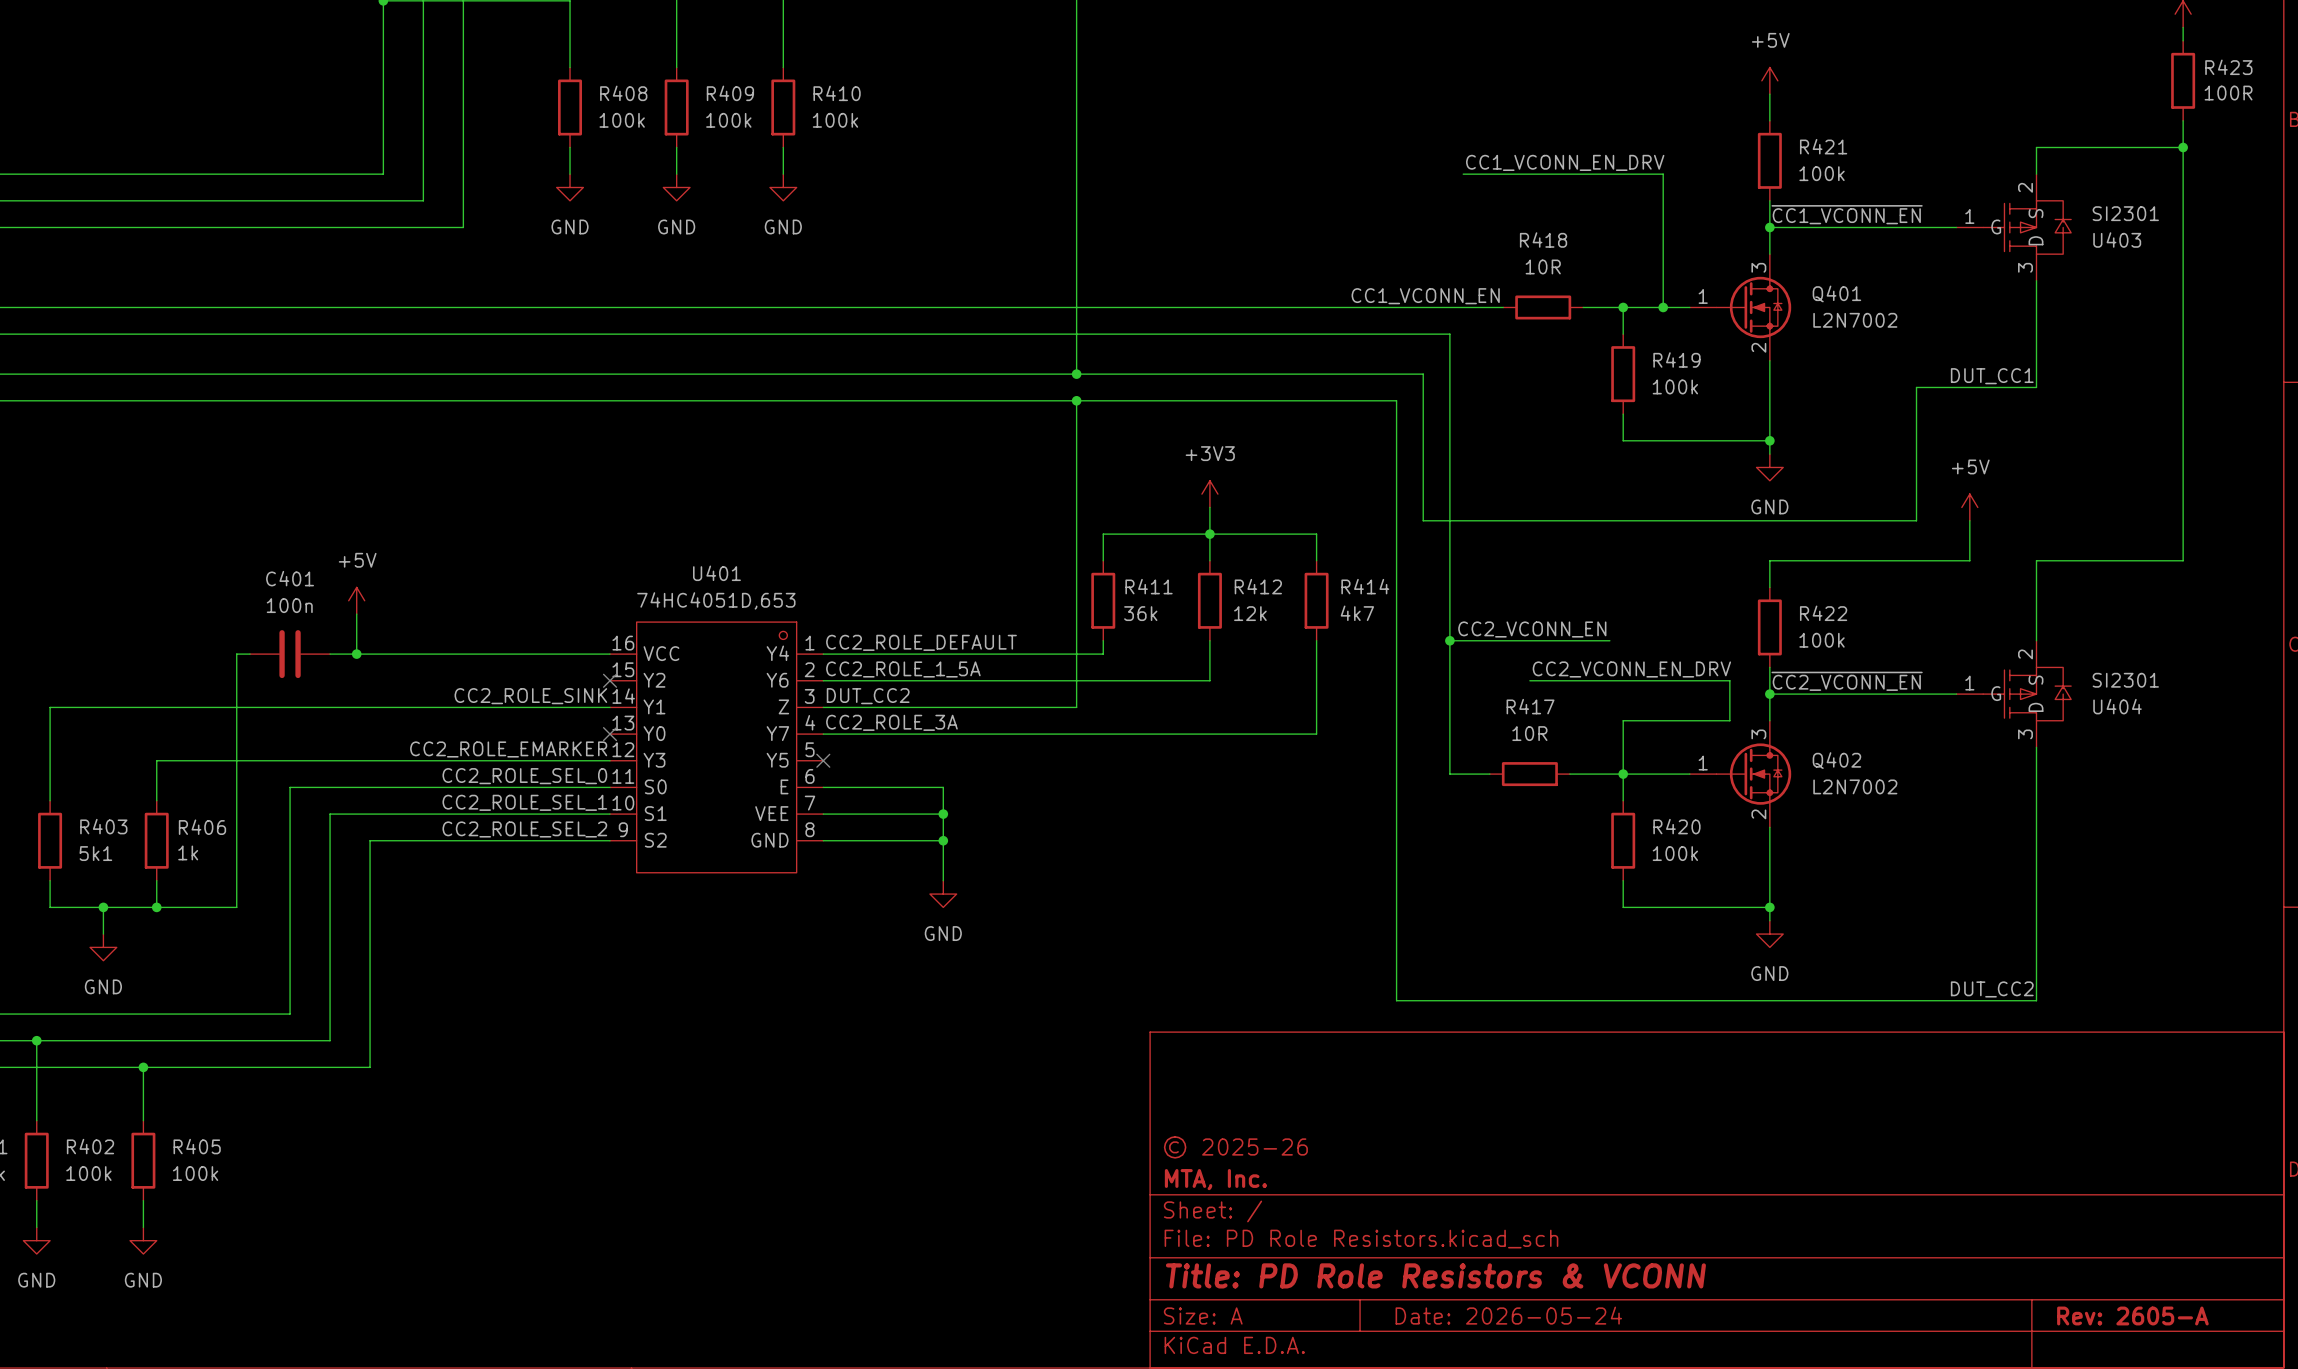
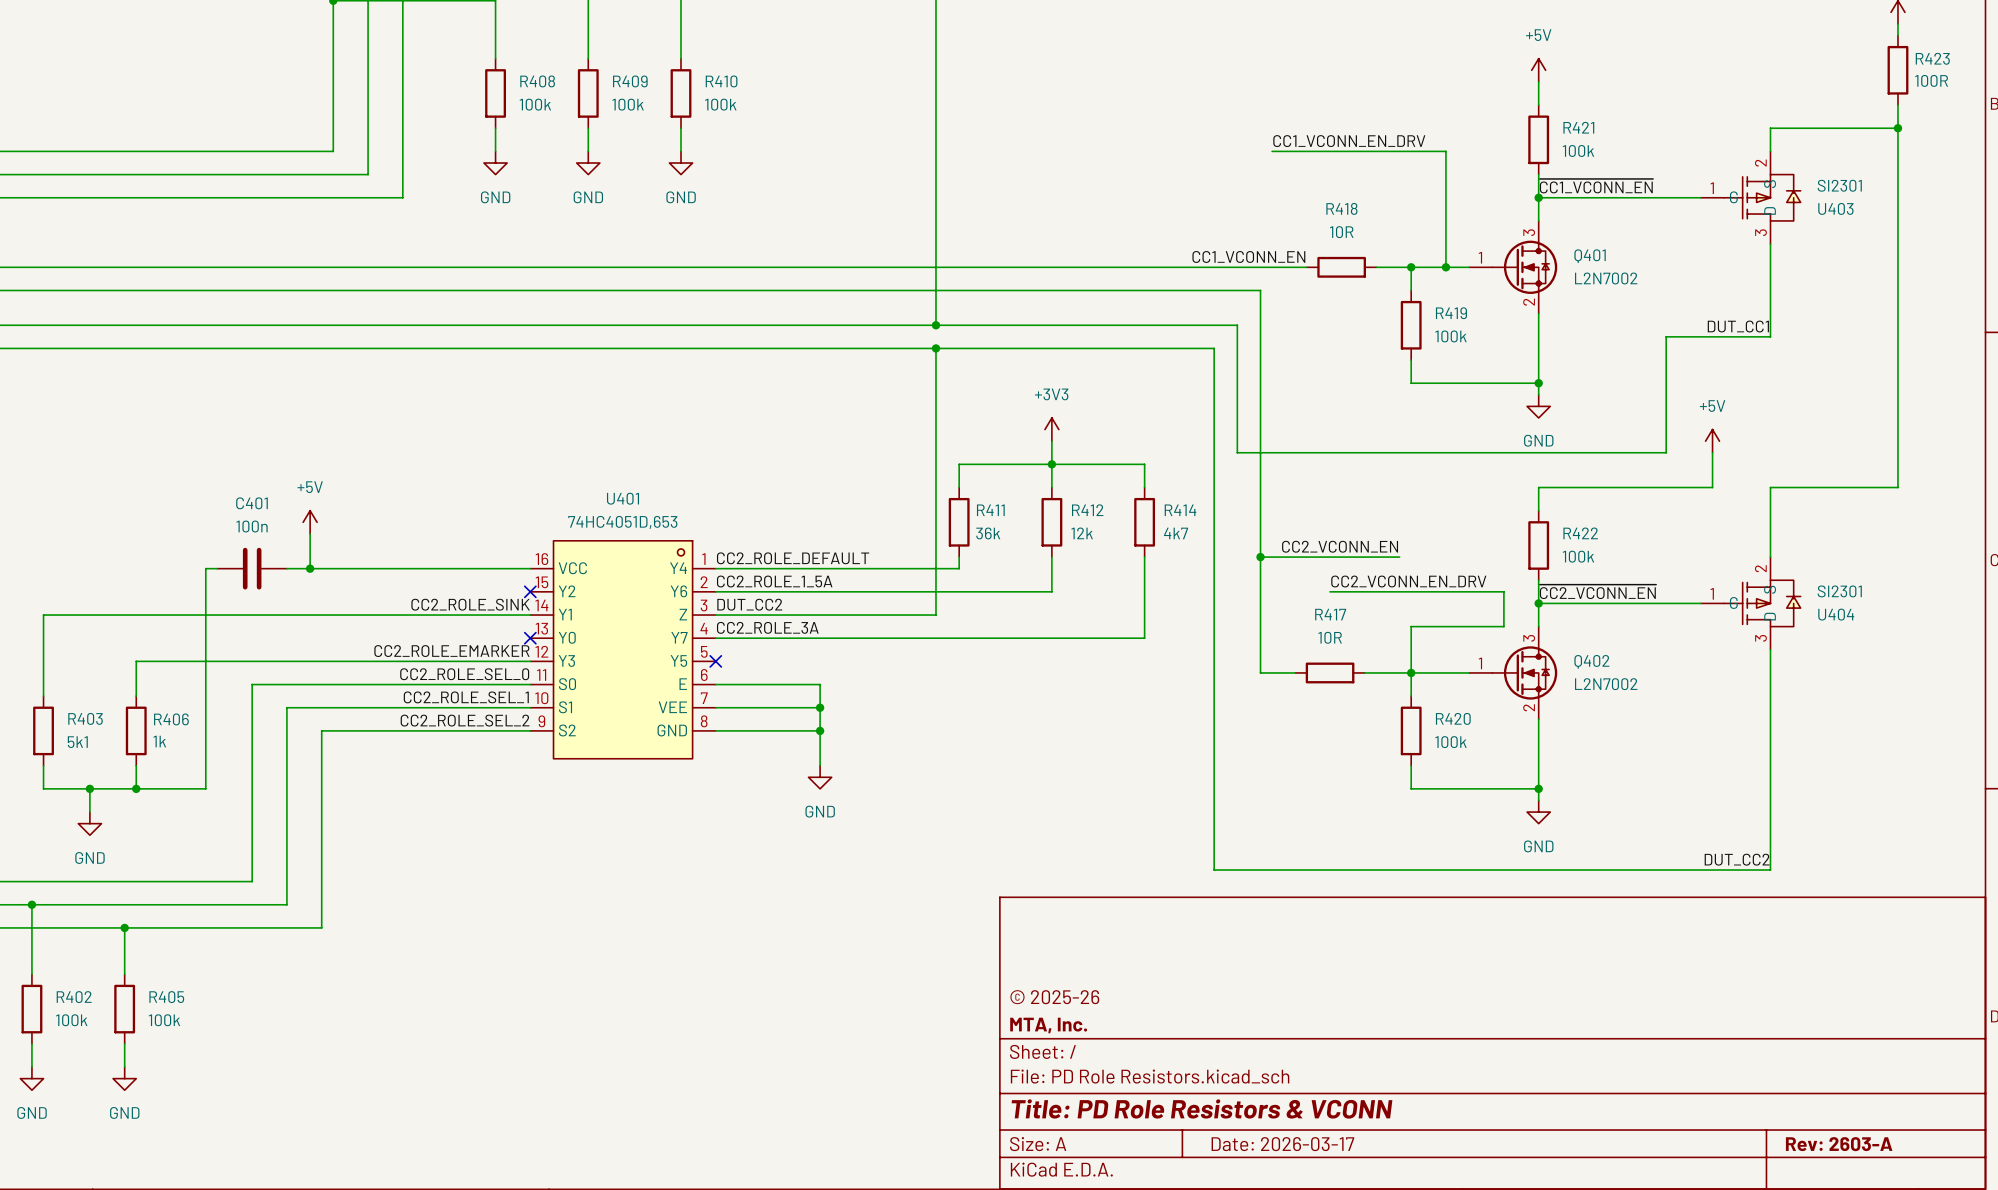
title block: Date: 2026-05-24 (1508, 1315) -> Date: 2026-03-17 (1282, 1144)
title block: Rev: 2605-A (2132, 1315) -> Rev: 2603-A (1839, 1144)

